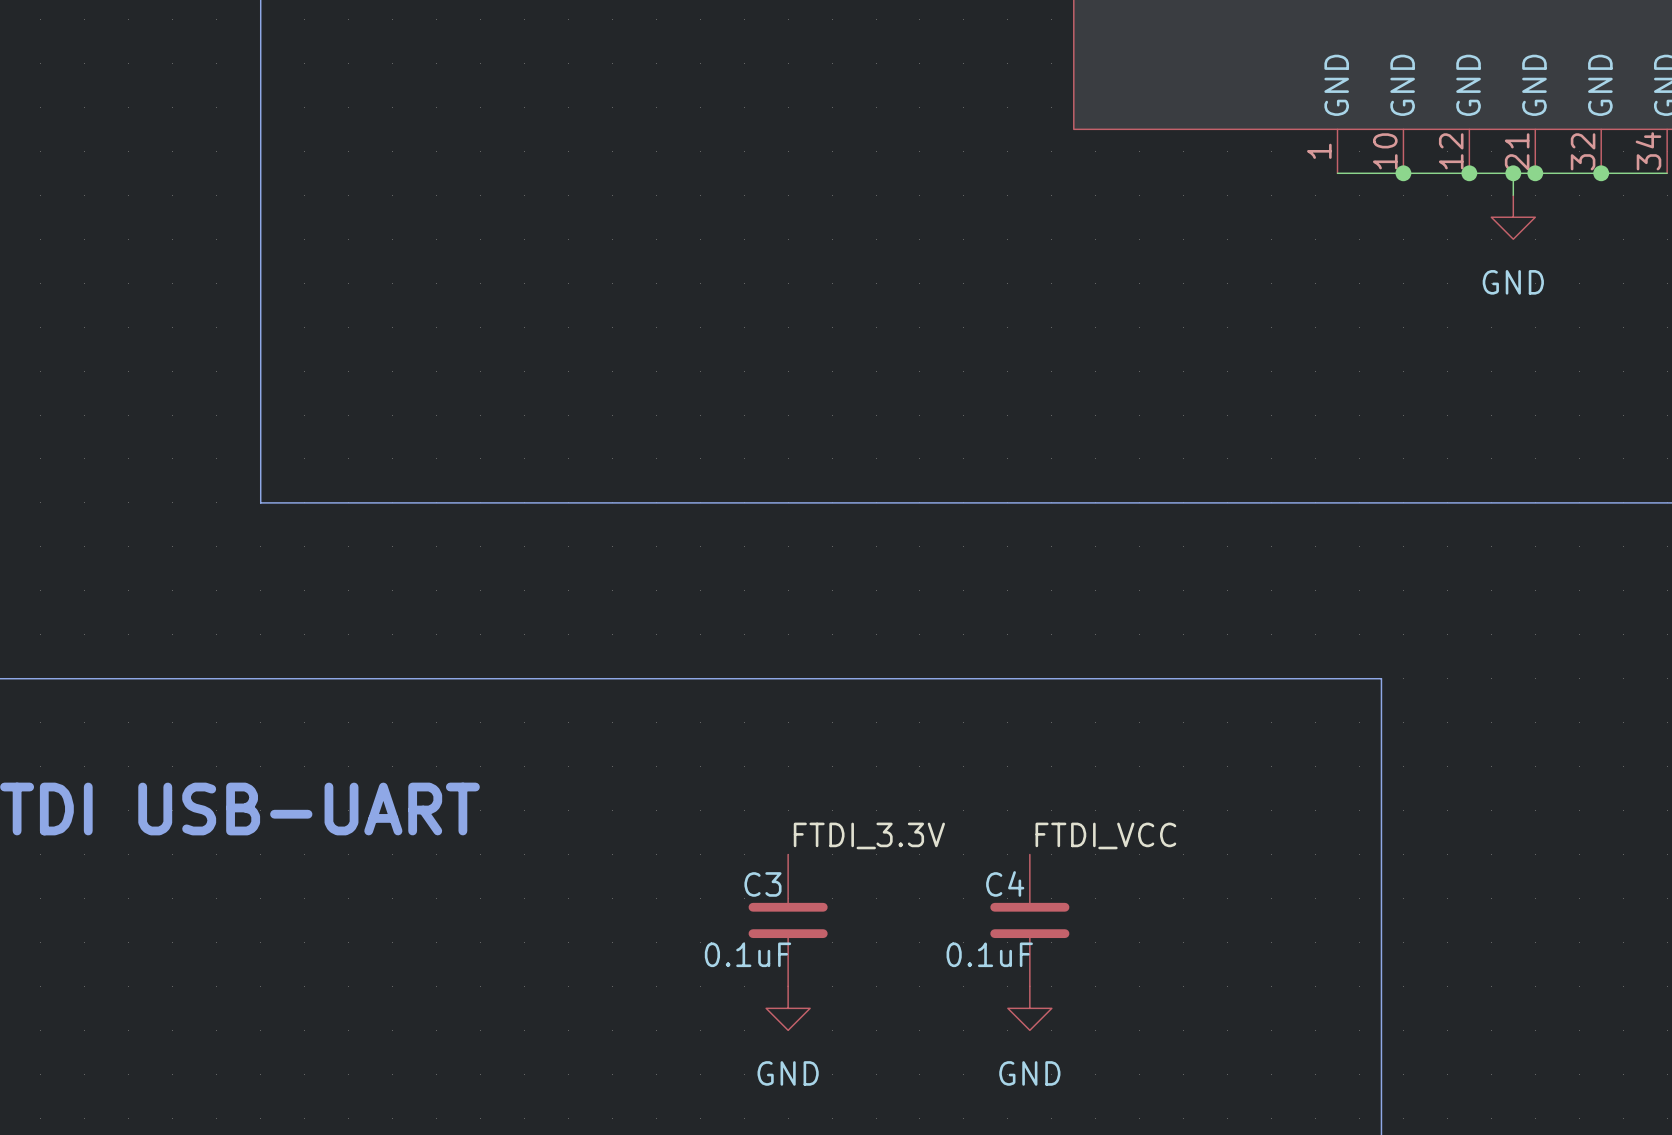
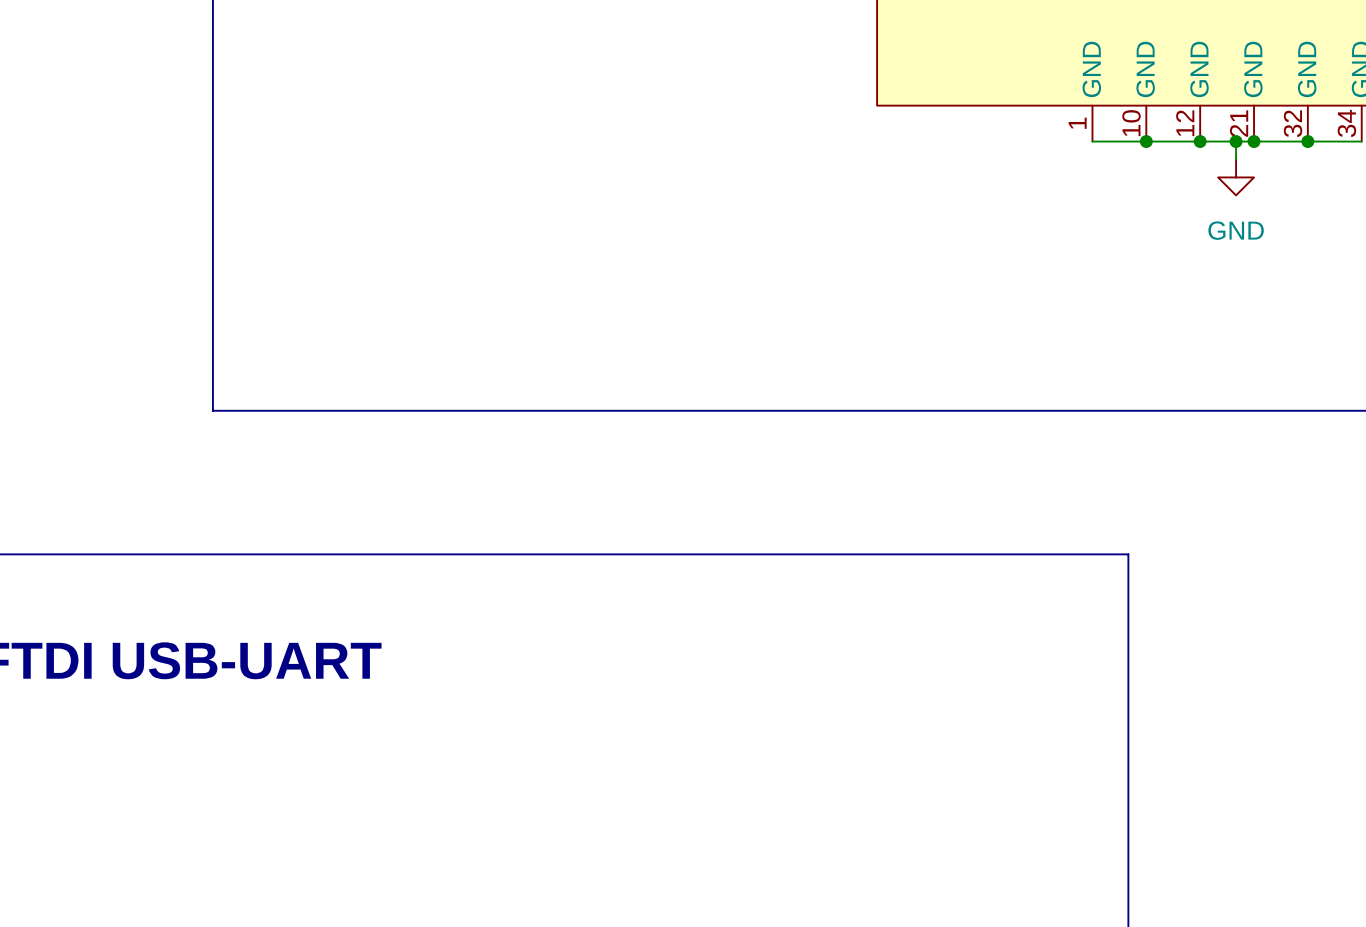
label: FTDI_3.3V (869, 835) -> none
label: FTDI_VCC (1105, 835) -> none
C3: 0.1uF (788, 920) -> none
C4: 0.1uF (1029, 920) -> none
power symbol: GND (788, 1008) -> none
power symbol: GND (1029, 1008) -> none

